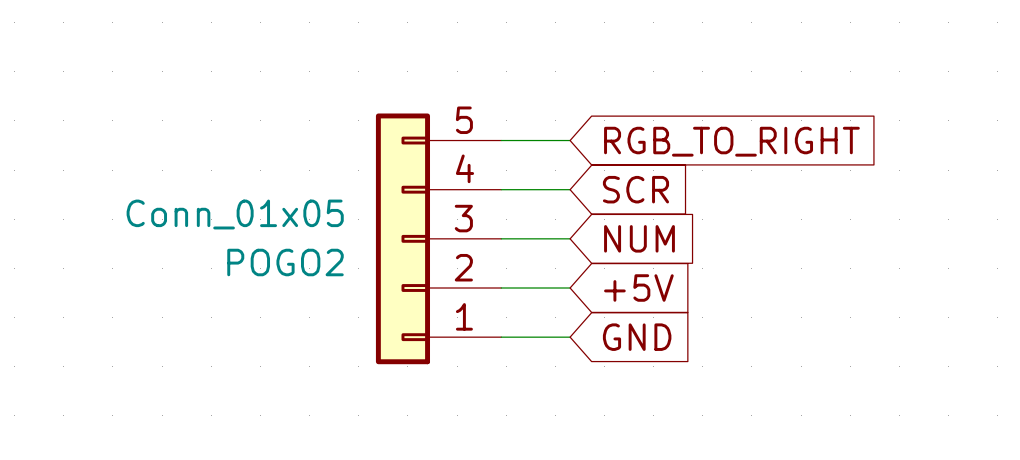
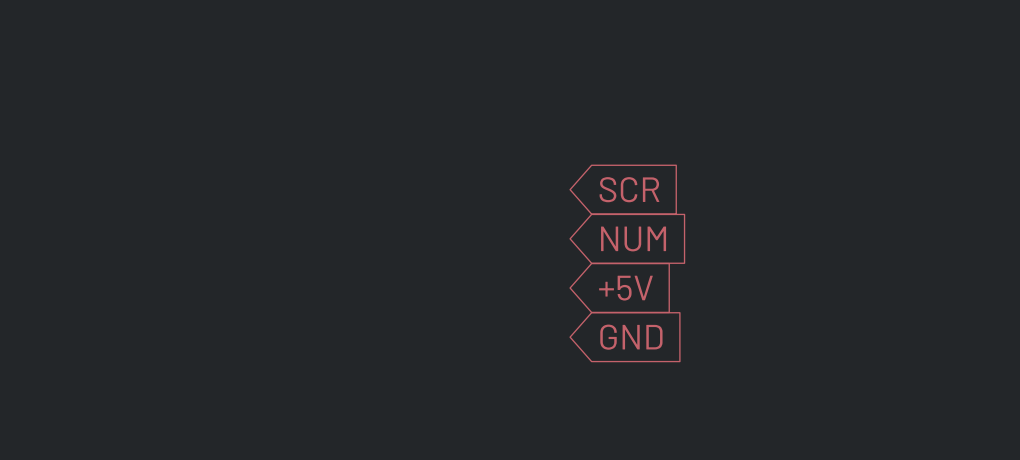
wire: (501, 140) (570, 140) -> none
global label: RGB_TO_RIGHT (731, 141) -> none
wire: (501, 189) (570, 189) -> none
POGO2: Conn_01x05 (438, 238) -> none
wire: (501, 238) (570, 238) -> none
wire: (501, 288) (570, 288) -> none
wire: (501, 337) (570, 337) -> none

